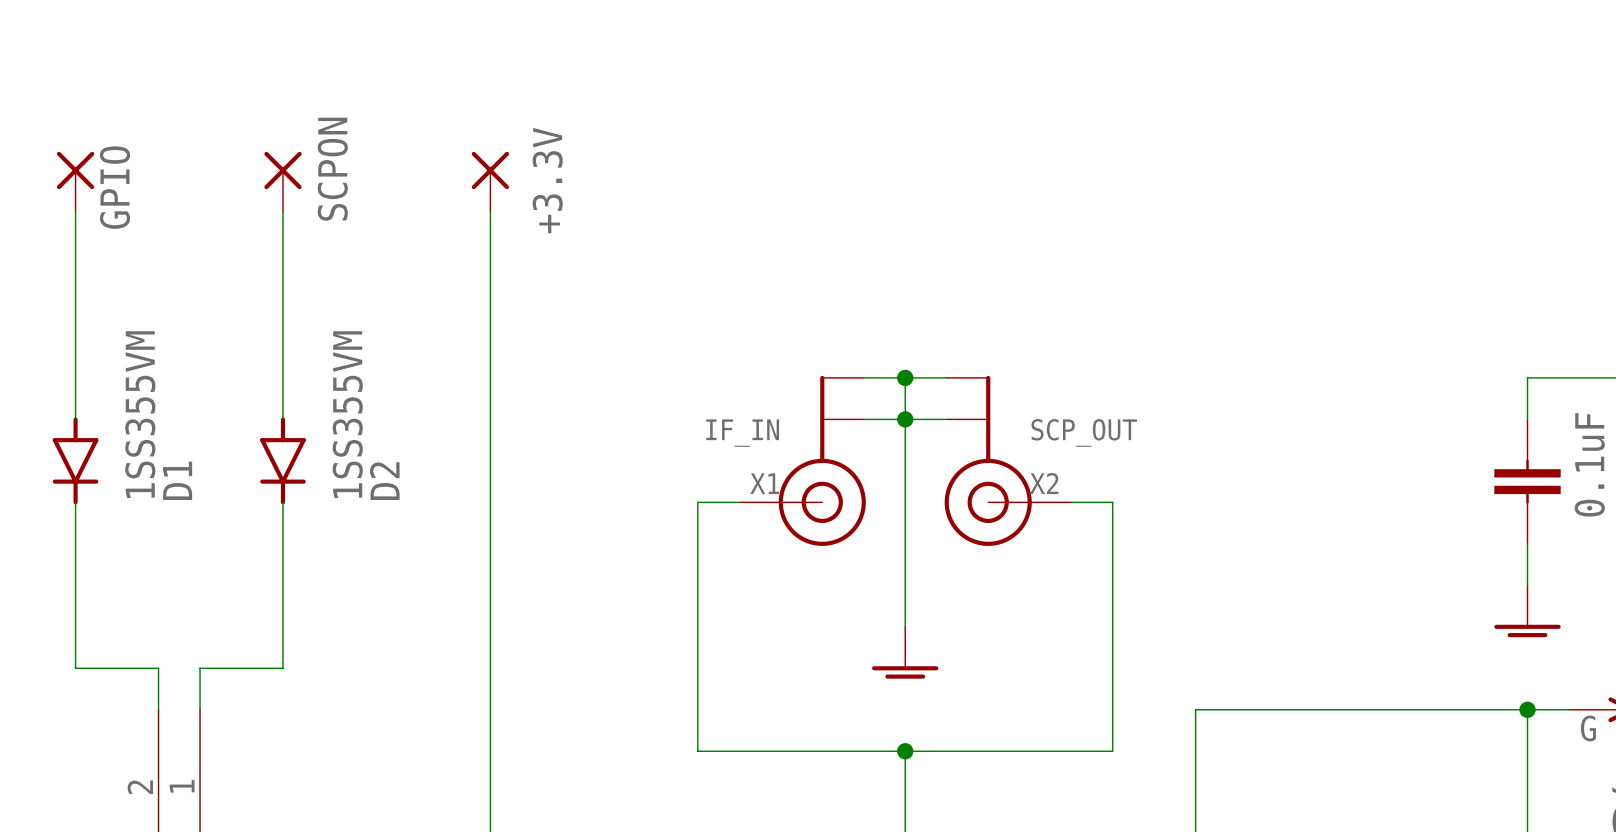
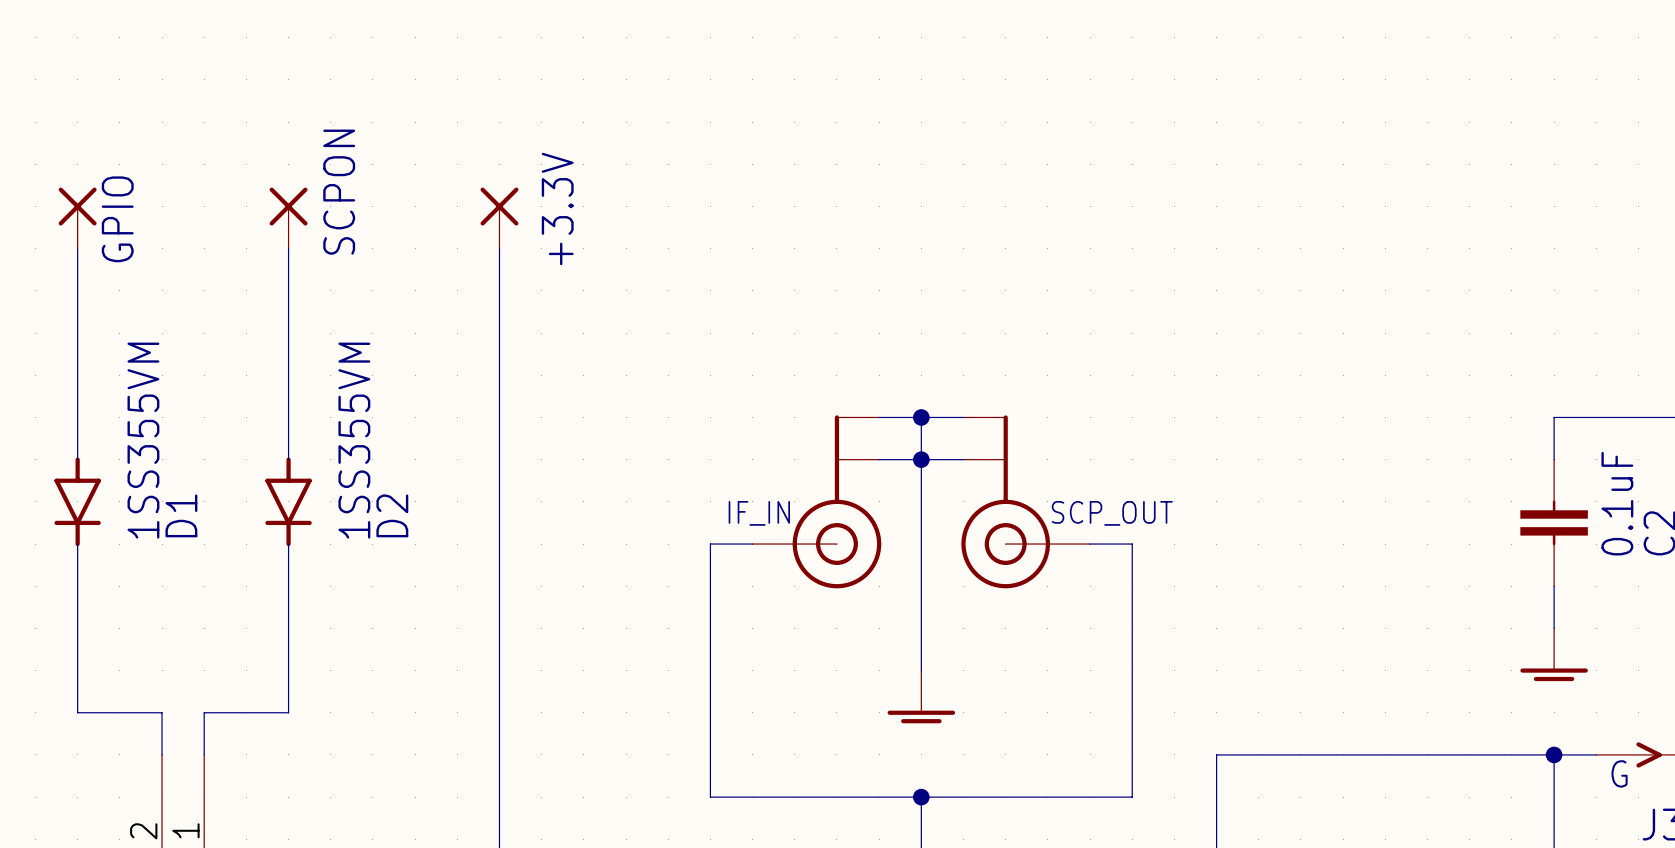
X2 value position: SCP_OUT (1084, 432) -> SCP_OUT (1112, 513)
X1 value position: IF_IN (742, 433) -> IF_IN (759, 513)
X1 name: X1 (764, 483) -> none
X2 name: X2 (1044, 483) -> none

